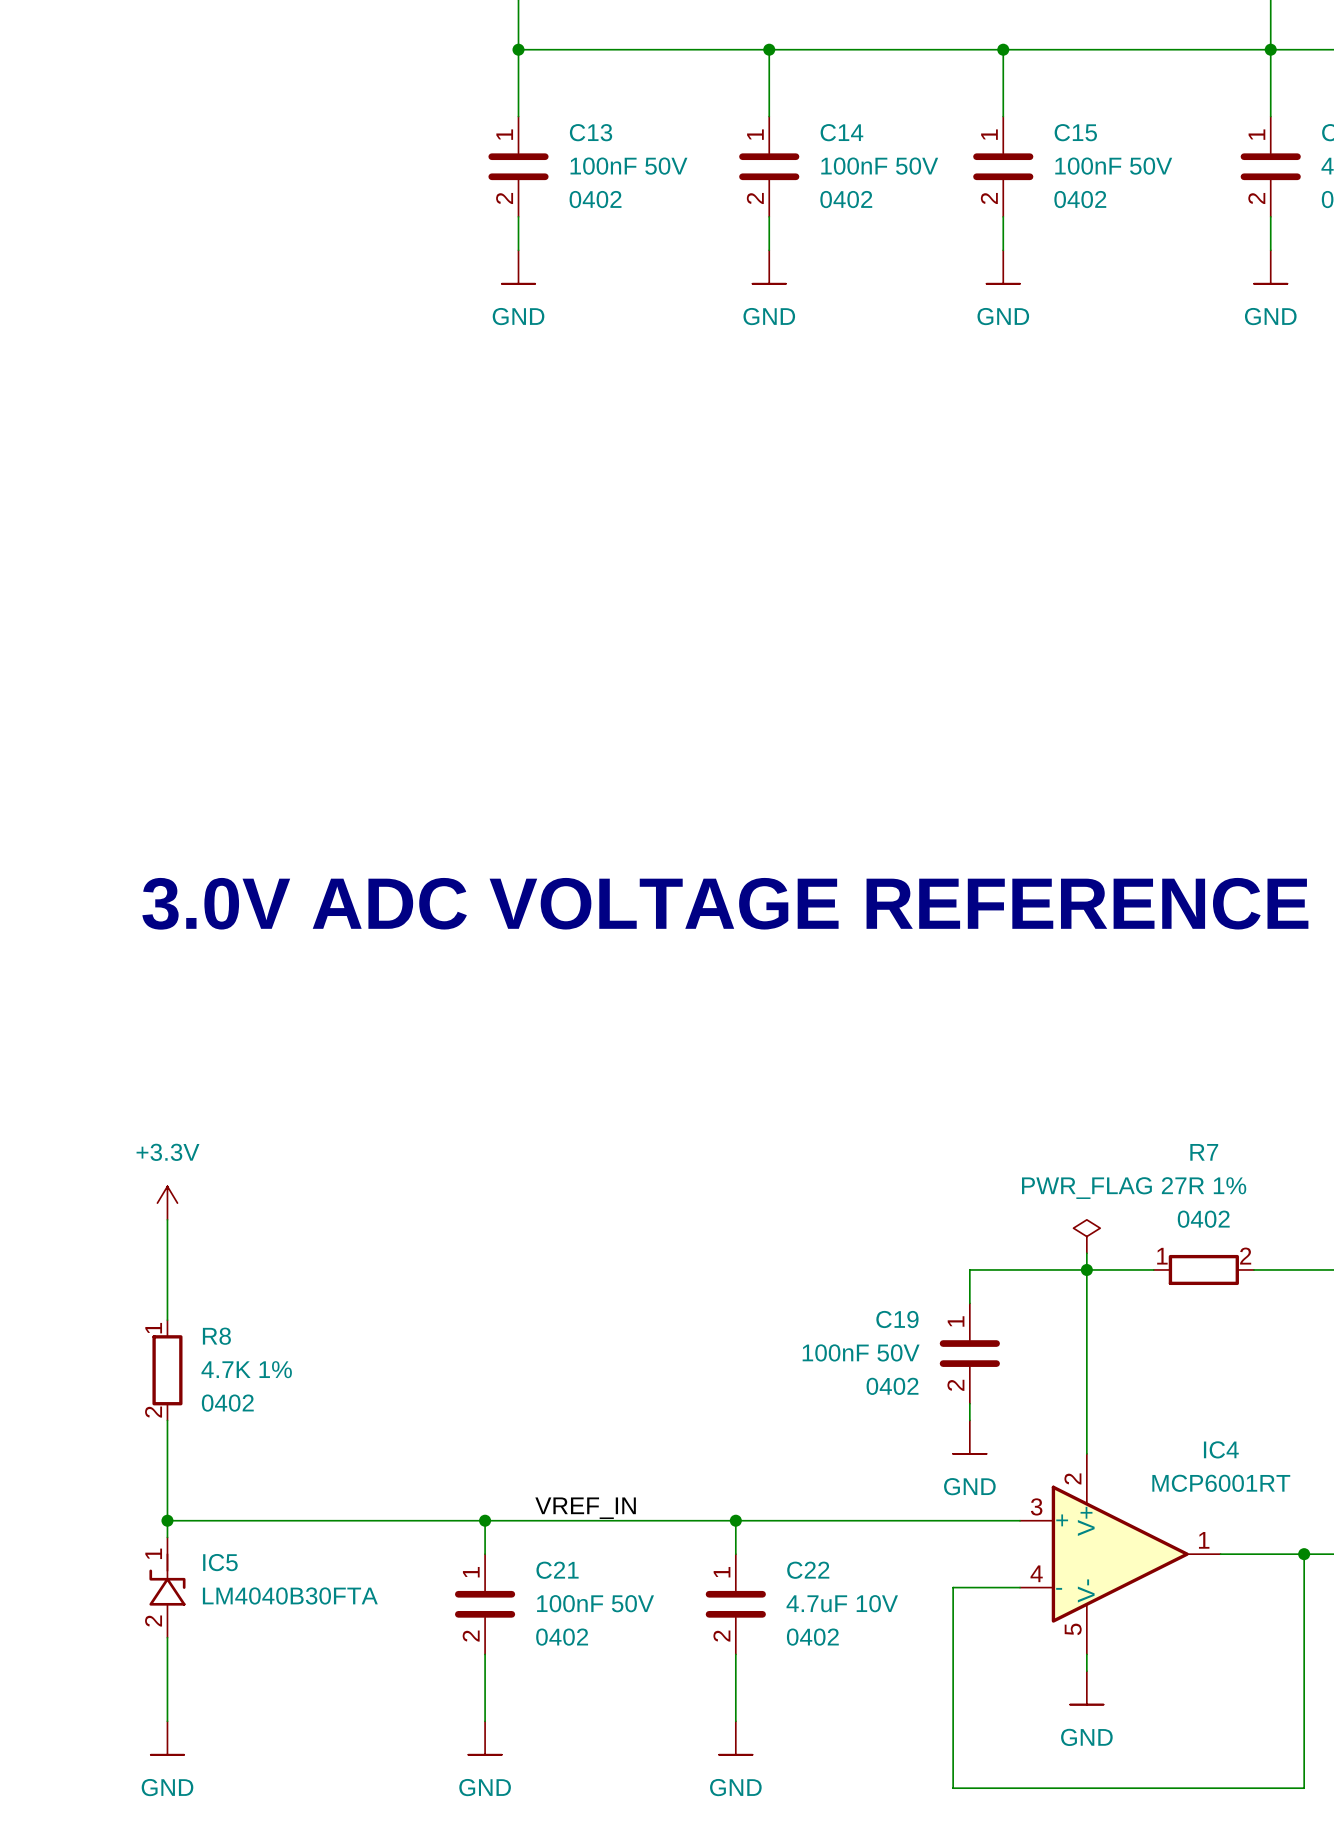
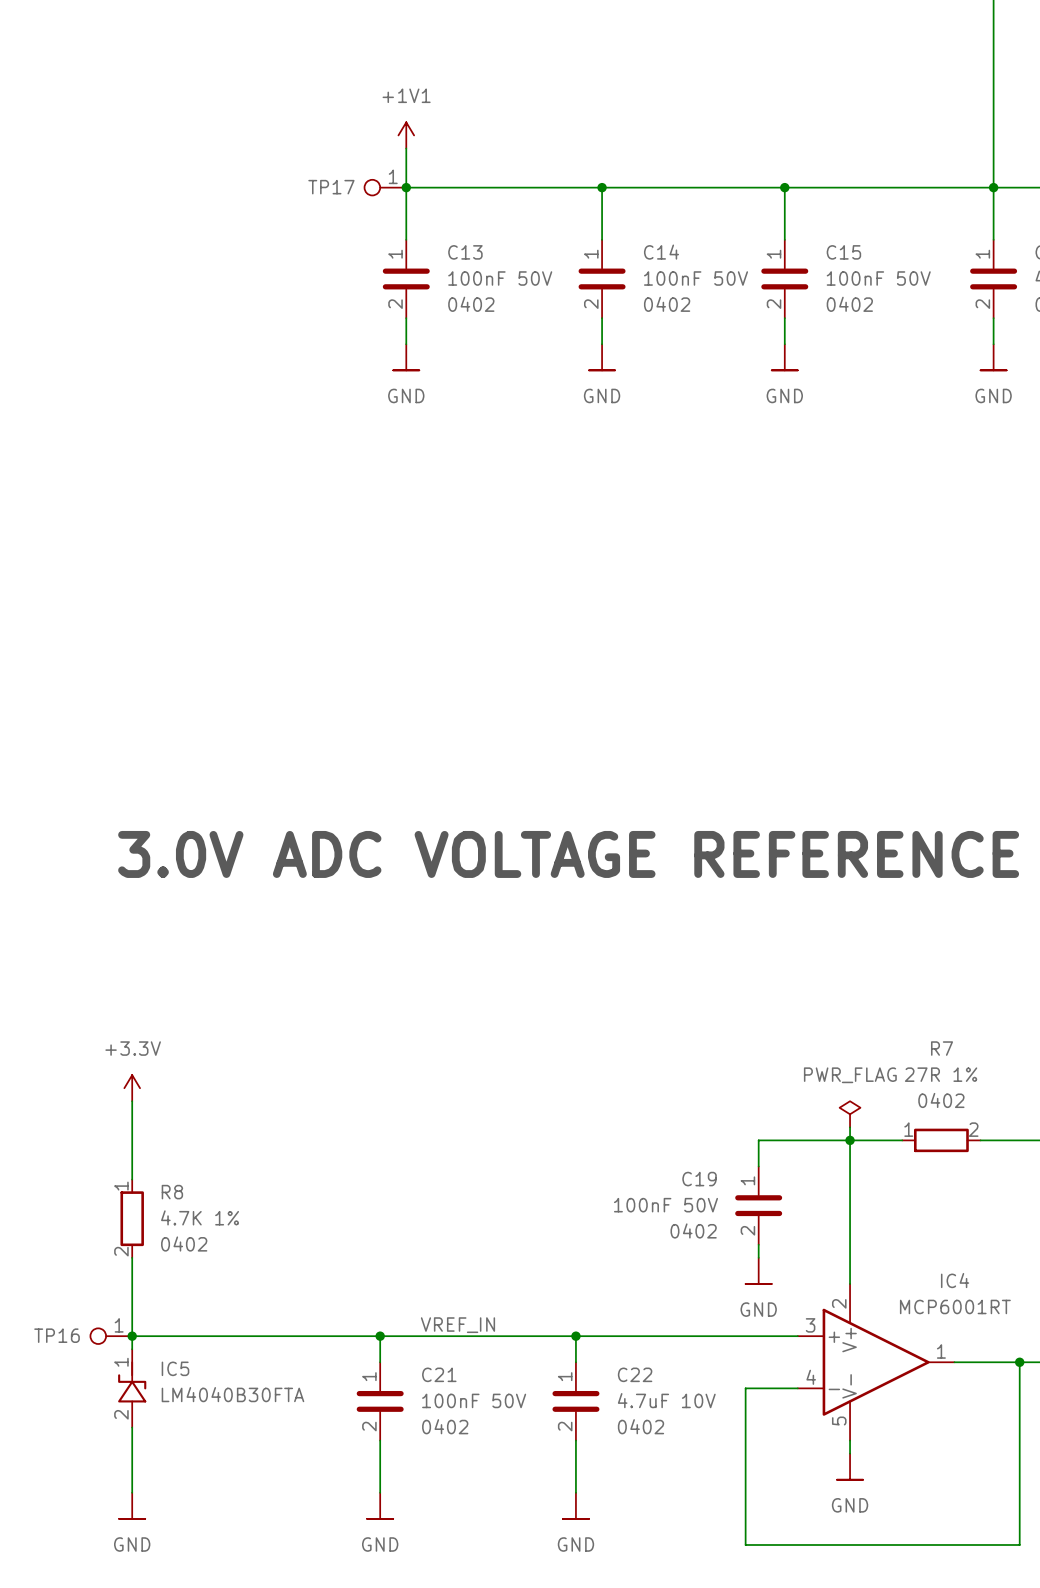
TP17: none -> (385, 187)
TP16: none -> (111, 1336)

